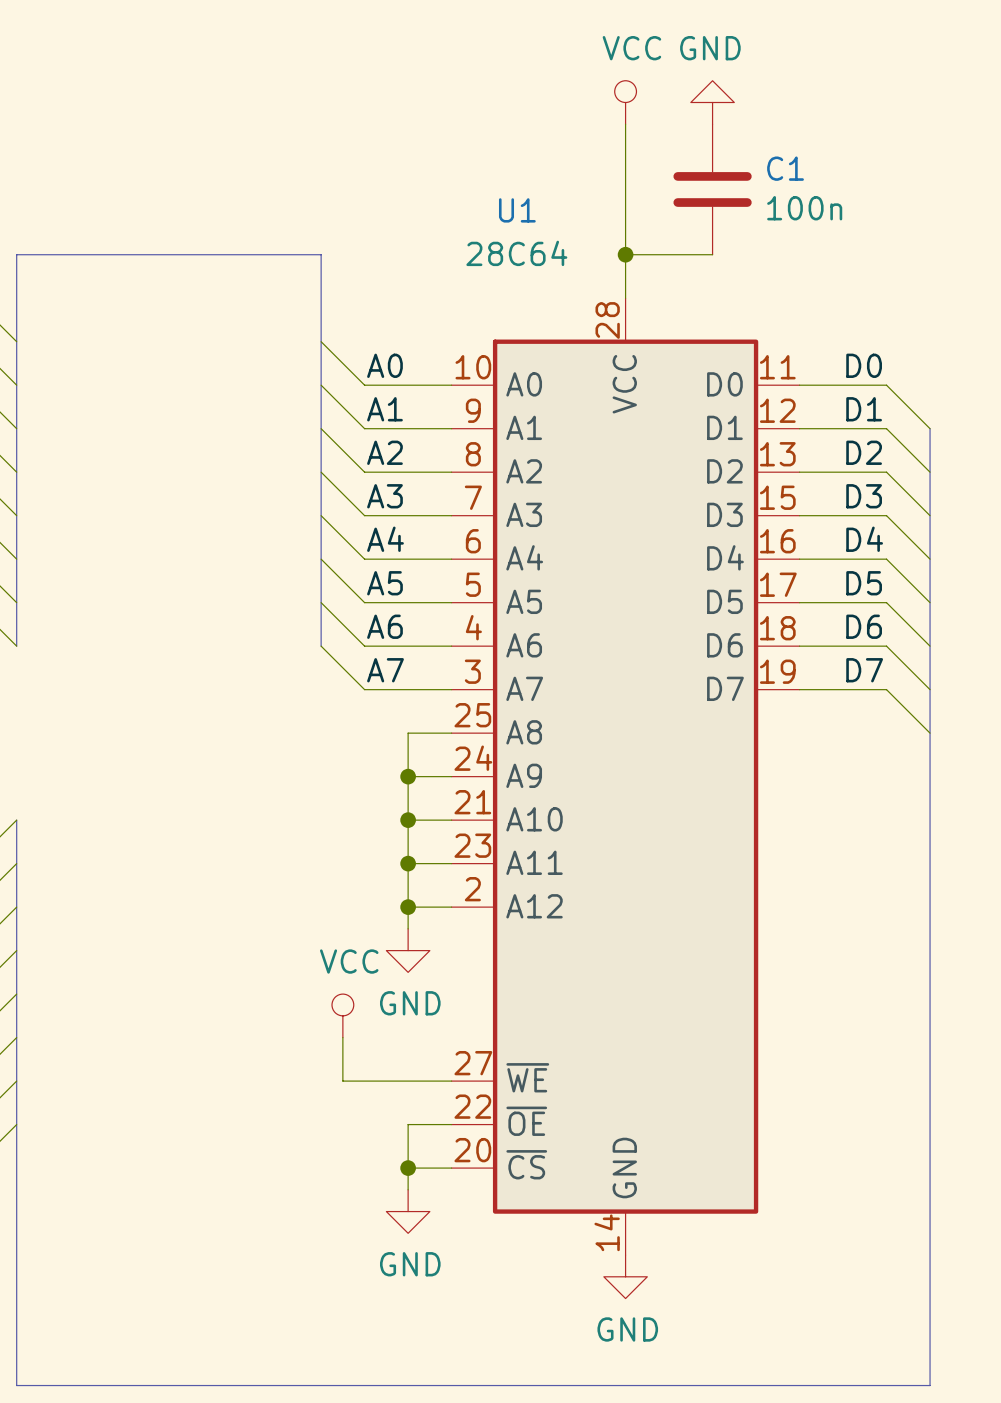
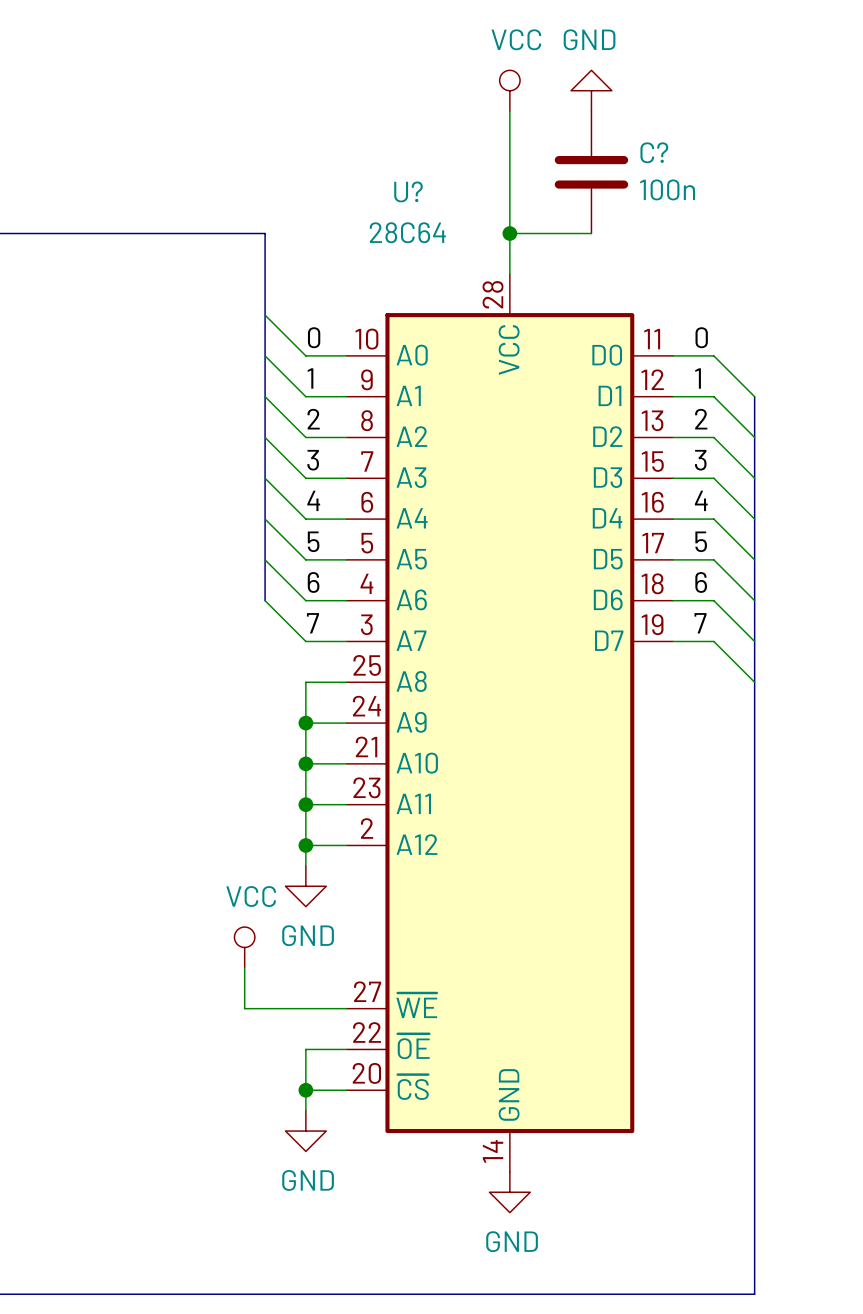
C1 name: C1 (785, 168) -> C? (654, 152)
U1 name: U1 (517, 210) -> U? (408, 191)
bus: (321, 254) (321, 646) -> (224, 233) (265, 233) (265, 600)
wire: (321, 341) (364, 385) (408, 385) -> (265, 315) (305, 355)
label: A0 (384, 365) -> 0 (314, 337)
label: D0 (864, 365) -> 0 (701, 337)
wire: (321, 385) (364, 428) (408, 428) -> (265, 355) (305, 396)
wire: (843, 385) (886, 385) (930, 428) -> (713, 355) (754, 396)
label: A1 (384, 409) -> 1 (310, 378)
label: D1 (864, 409) -> 1 (698, 378)
wire: (321, 428) (364, 472) (408, 472) -> (265, 396) (305, 437)
wire: (843, 428) (886, 428) (930, 472) -> (713, 396) (754, 437)
bus: (930, 428) (930, 1385) (886, 1385) -> (754, 396) (754, 1294)
label: A2 (384, 452) -> 2 (313, 419)
label: D2 (864, 452) -> 2 (701, 419)
wire: (321, 472) (364, 515) (408, 515) -> (265, 437) (305, 478)
wire: (843, 472) (886, 472) (930, 515) -> (713, 437) (754, 478)
label: A3 (384, 496) -> 3 (313, 460)
label: D3 (864, 496) -> 3 (700, 460)
wire: (321, 515) (364, 559) (408, 559) -> (265, 478) (305, 519)
wire: (843, 515) (886, 515) (930, 559) -> (713, 478) (754, 519)
label: A4 (385, 539) -> 4 (313, 500)
label: D4 (864, 539) -> 4 (701, 500)
wire: (321, 559) (364, 602) (408, 602) -> (265, 519) (305, 559)
wire: (843, 559) (886, 559) (930, 602) -> (713, 519) (754, 559)
label: A5 (384, 583) -> 5 (313, 541)
label: D5 (864, 583) -> 5 (701, 541)
wire: (321, 602) (364, 646) (408, 646) -> (265, 559) (305, 600)
wire: (843, 602) (886, 602) (930, 646) -> (713, 559) (754, 600)
label: A6 (384, 626) -> 6 (313, 582)
label: D6 (864, 626) -> 6 (701, 582)
wire: (321, 646) (364, 689) (408, 689) -> (265, 600) (305, 641)
wire: (843, 646) (886, 646) (930, 689) -> (713, 600) (754, 641)
label: A7 (385, 670) -> 7 (312, 623)
label: D7 (864, 670) -> 7 (700, 623)
wire: (843, 689) (886, 689) (930, 733) -> (713, 641) (754, 682)

